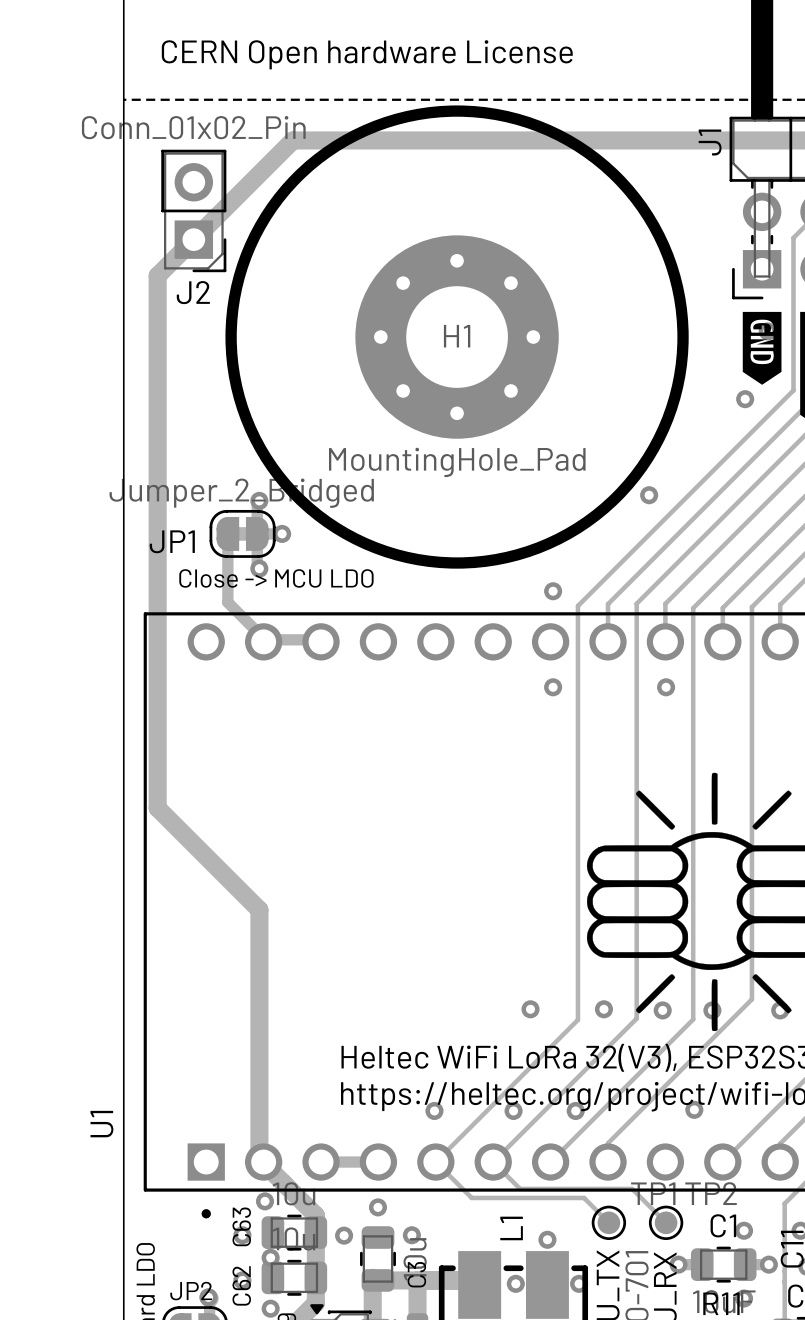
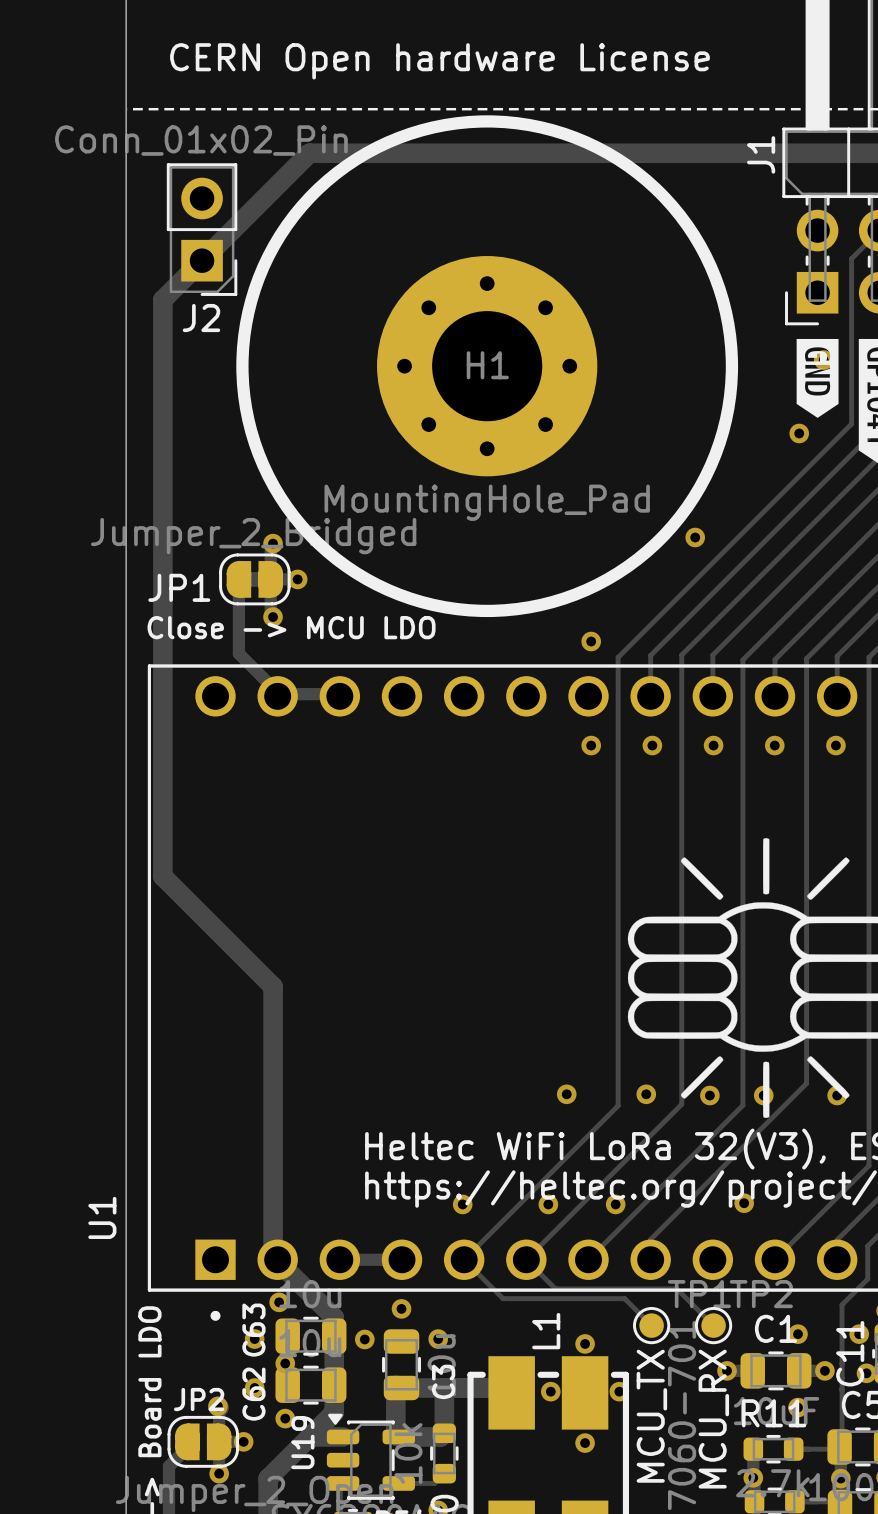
via: none -> (652, 745)
via: none -> (774, 745)
via: none -> (835, 745)

